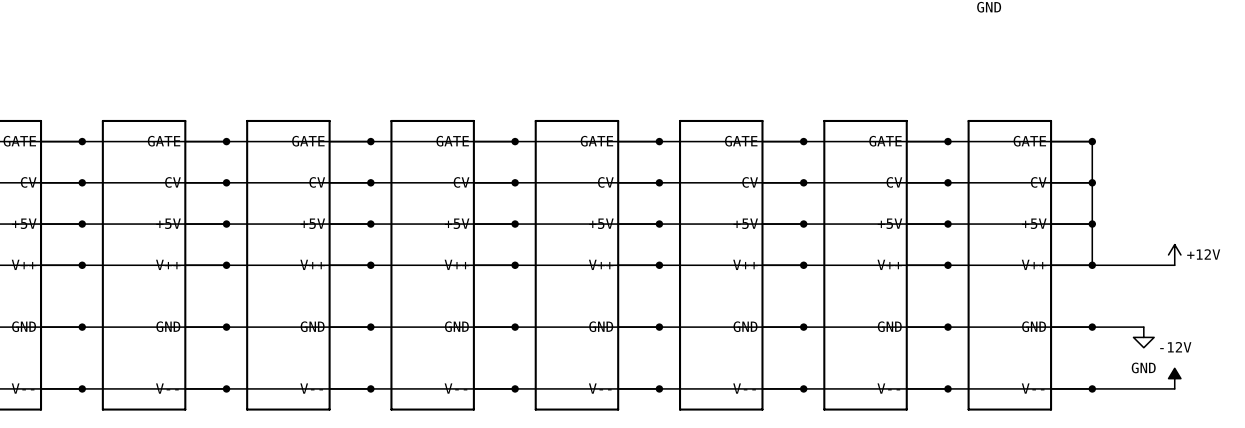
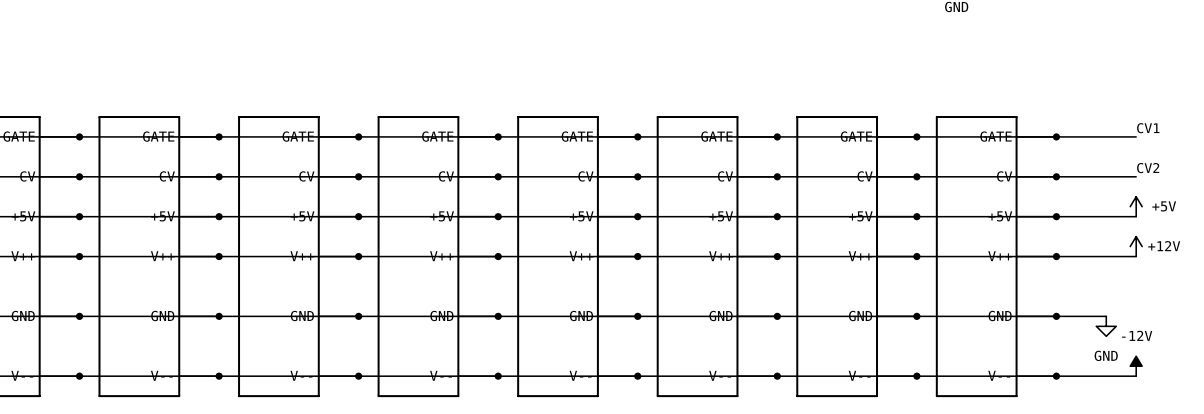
label: none -> CV1 (1148, 128)
wire: (1092, 141) (1092, 265) -> (1056, 136) (1136, 136)
label: none -> CV2 (1148, 168)
wire: none -> (1056, 176) (1136, 176)
power symbol: none -> +5V (1136, 206)
wire: none -> (1056, 216) (1136, 216)

